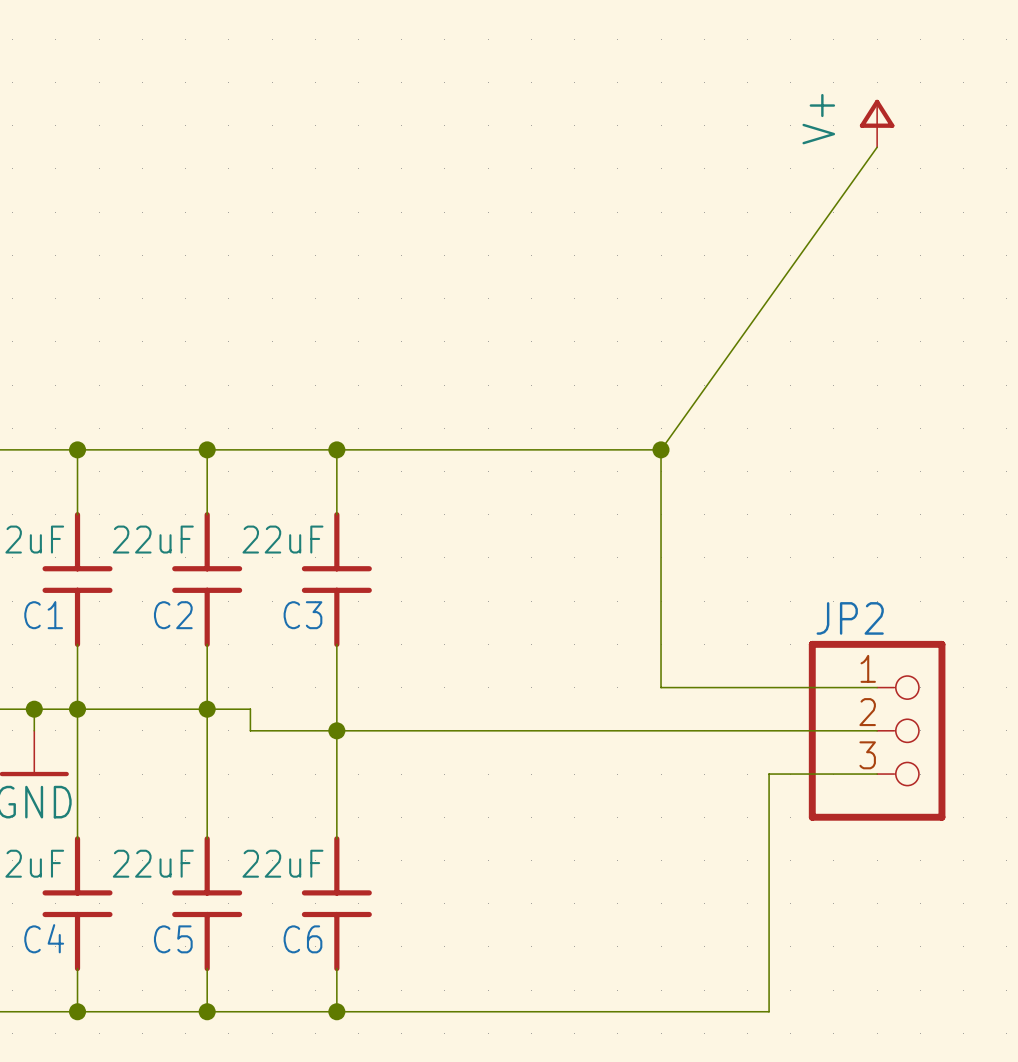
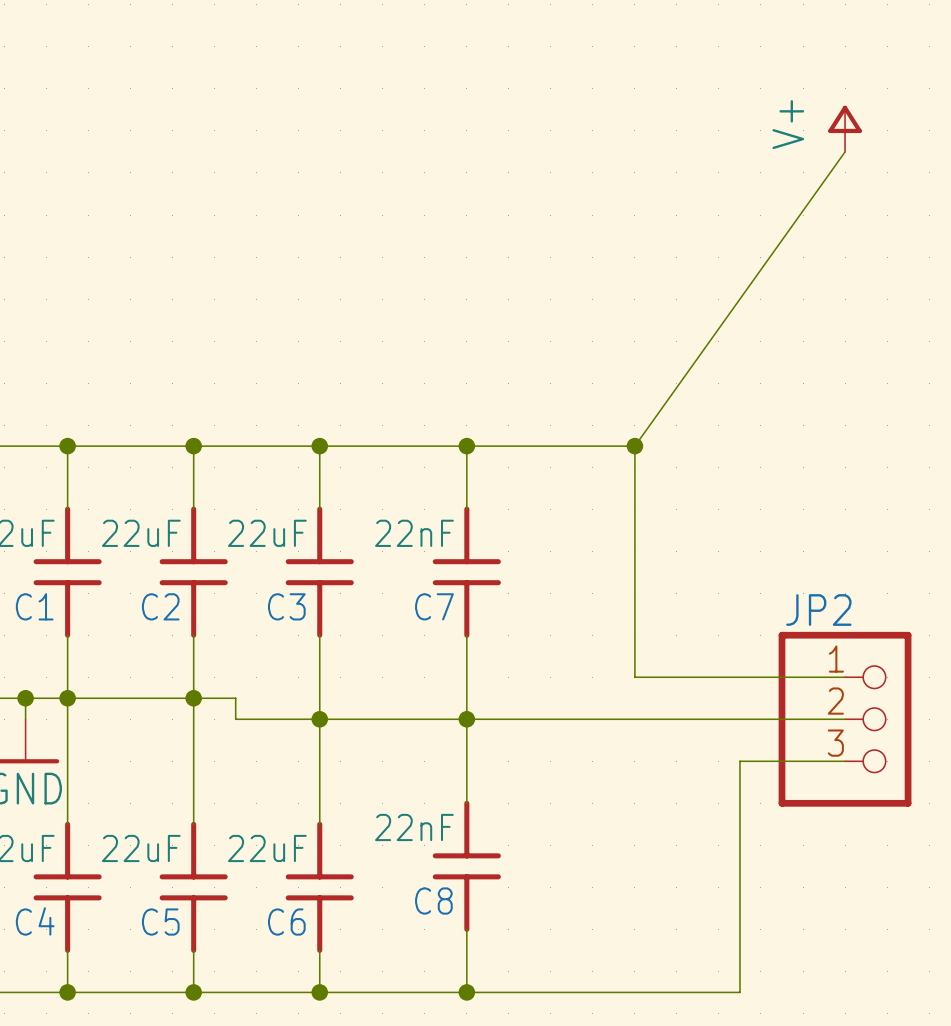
wire: none -> (466, 446) (466, 509)
junction: none -> (466, 446)
C7: none -> 22nF (466, 572)
wire: none -> (466, 635) (466, 803)
junction: none -> (466, 719)
C8: none -> 22nF (466, 866)
wire: none -> (466, 929) (466, 992)
junction: none -> (466, 992)

